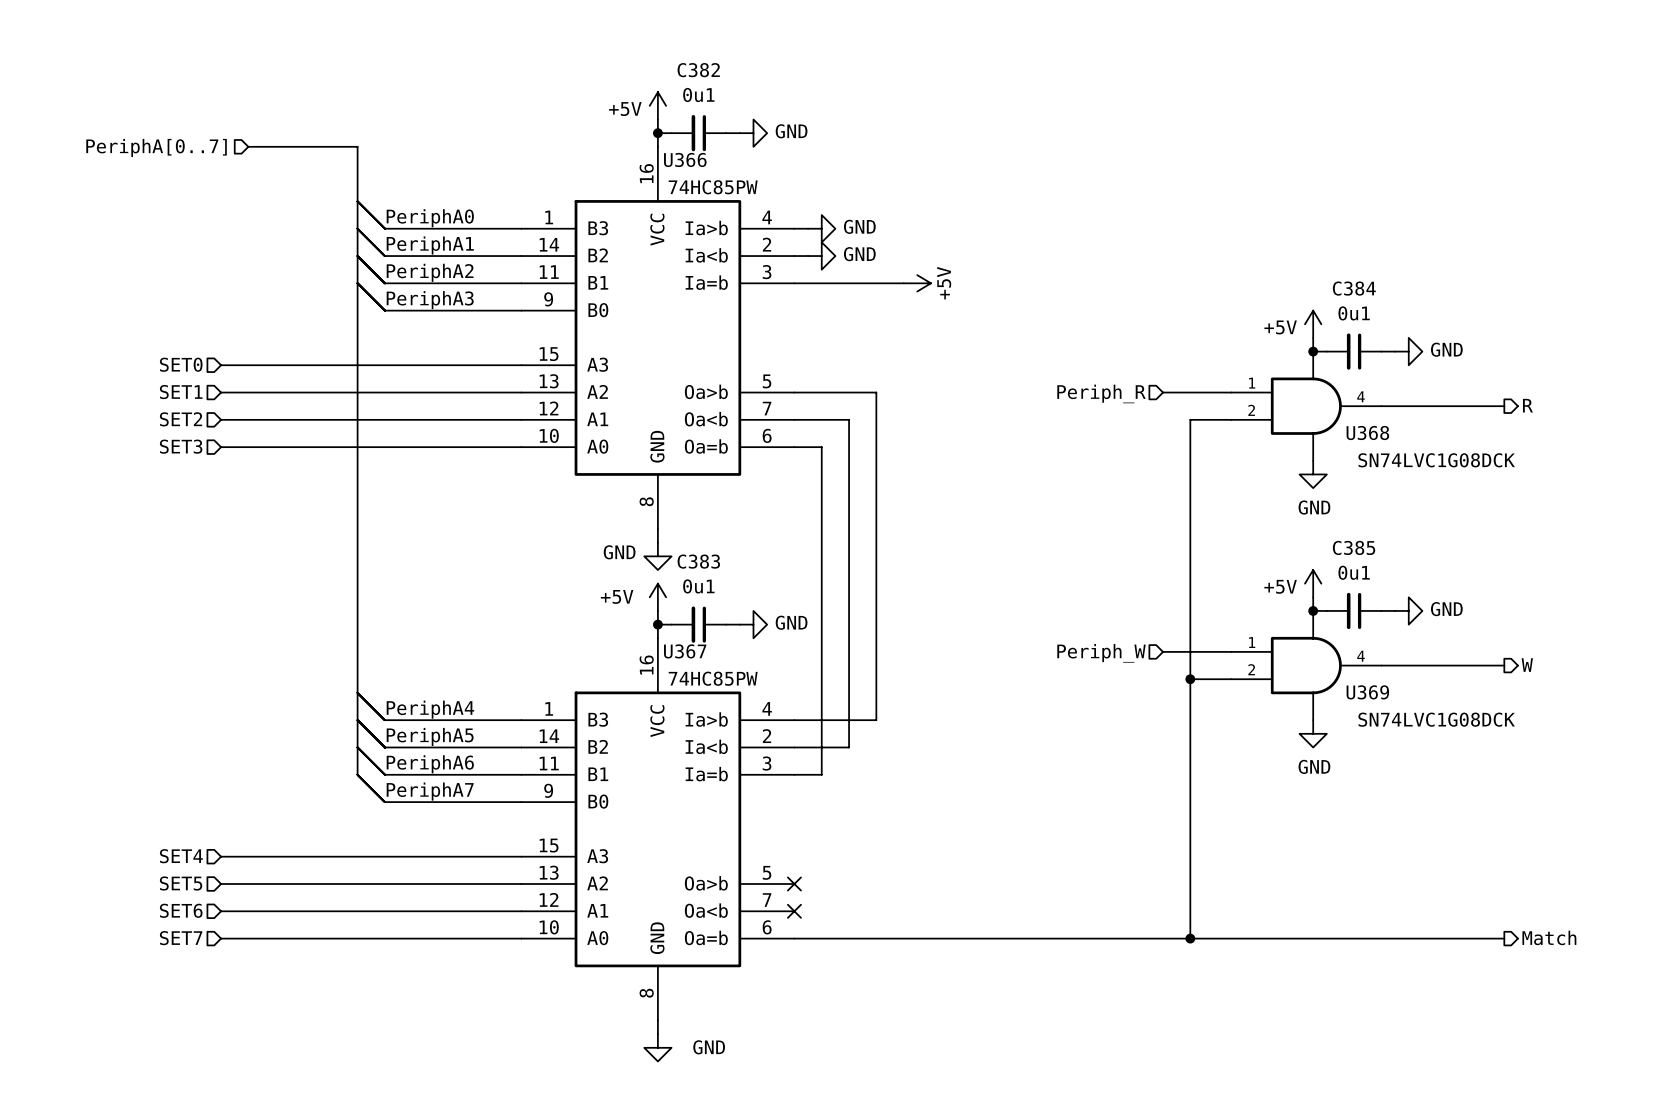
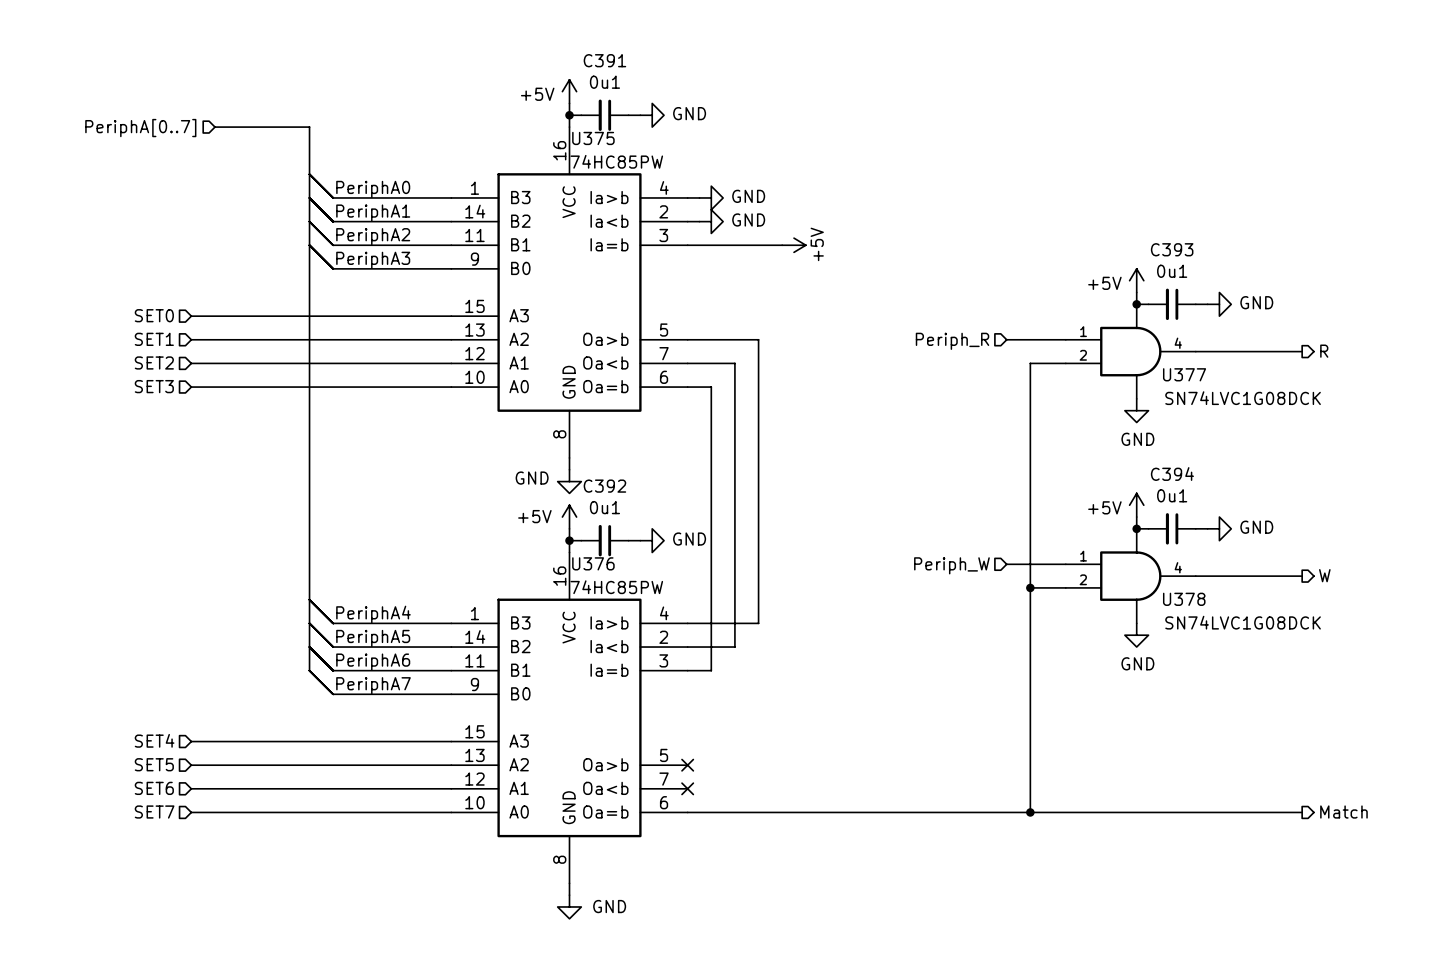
C382 name: C382 (698, 70) -> C391 (604, 60)
U366 name: U366 (685, 159) -> U375 (593, 138)
C384 name: C384 (1354, 288) -> C393 (1172, 249)
U368 name: U368 (1367, 432) -> U377 (1184, 374)
C385 name: C385 (1354, 547) -> C394 (1172, 474)
C383 name: C383 (698, 561) -> C392 (604, 486)
U367 name: U367 (685, 651) -> U376 (593, 563)
U369 name: U369 (1367, 692) -> U378 (1184, 599)

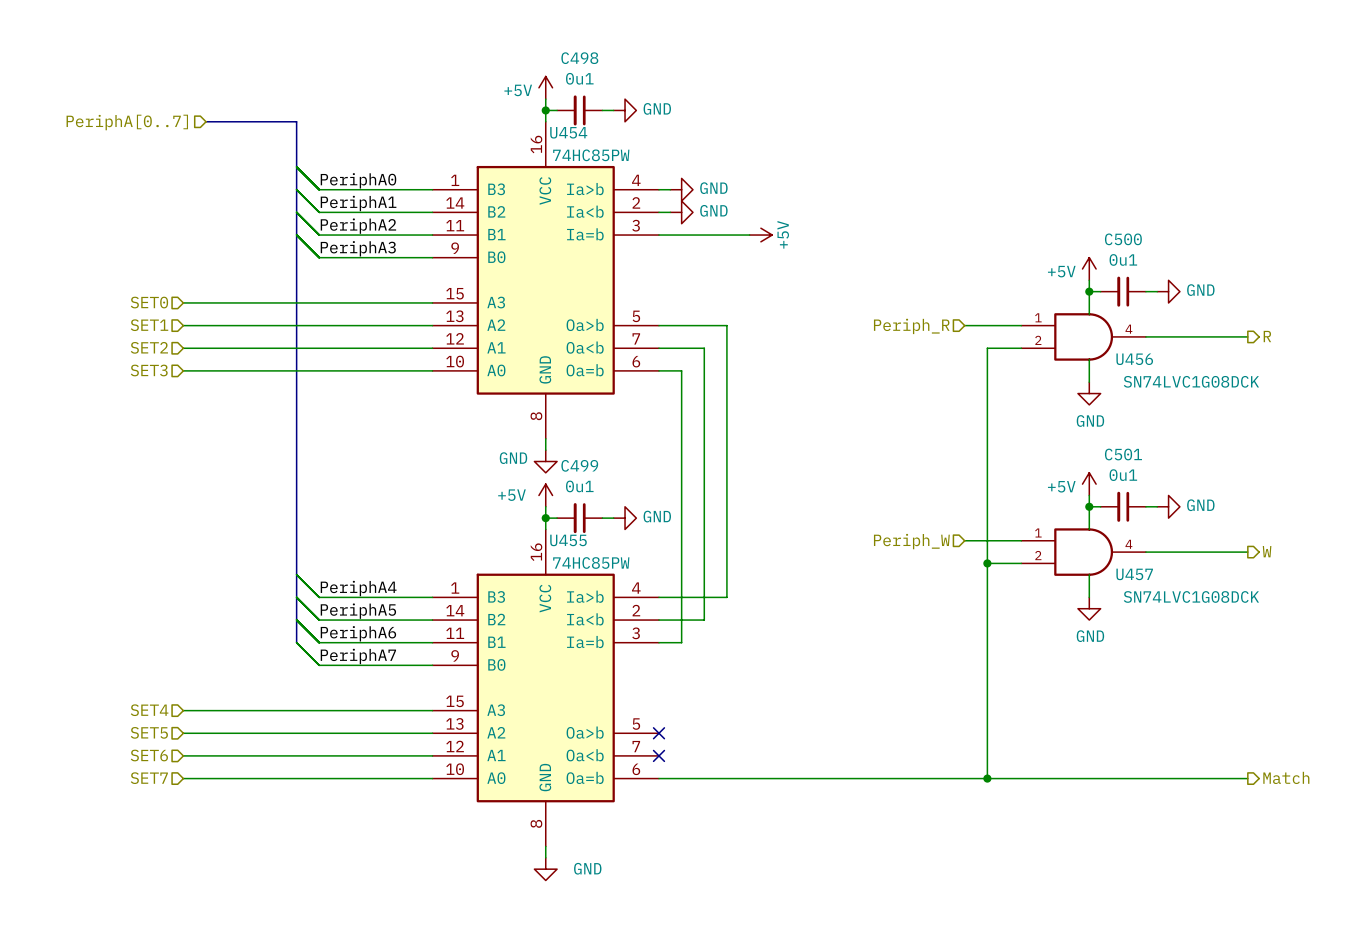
C391 name: C391 (604, 60) -> C498 (579, 58)
U375 name: U375 (593, 138) -> U454 (568, 132)
C393 name: C393 (1172, 249) -> C500 (1123, 239)
U377 name: U377 (1184, 374) -> U456 (1134, 359)
C394 name: C394 (1172, 474) -> C501 (1123, 454)
C392 name: C392 (604, 486) -> C499 (579, 465)
U376 name: U376 (593, 563) -> U455 (568, 540)
U378 name: U378 (1184, 599) -> U457 (1134, 574)

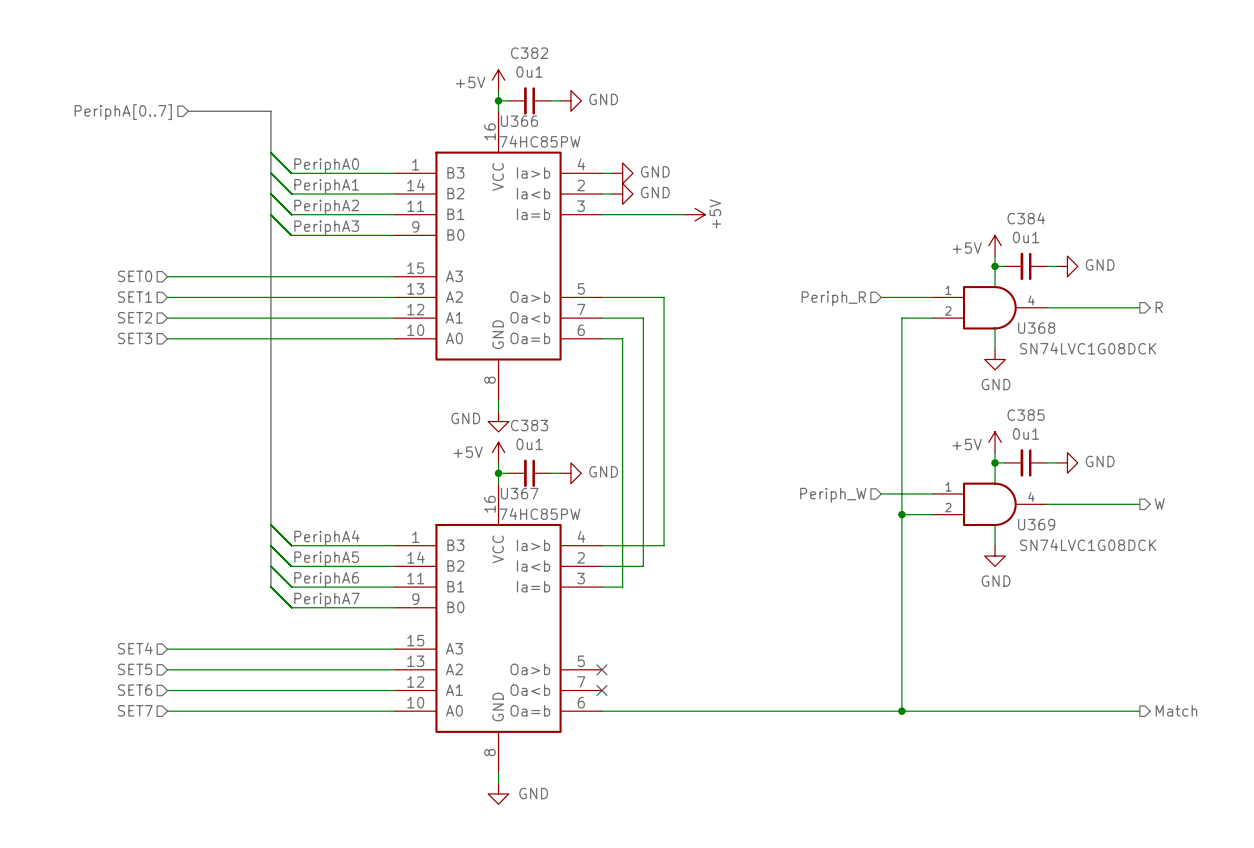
C498 name: C498 (579, 58) -> C382 (529, 53)
U454 name: U454 (568, 132) -> U366 (519, 121)
C500 name: C500 (1123, 239) -> C384 (1026, 218)
U456 name: U456 (1134, 359) -> U368 (1036, 328)
C501 name: C501 (1123, 454) -> C385 (1026, 415)
C499 name: C499 (579, 465) -> C383 (529, 425)
U455 name: U455 (568, 540) -> U367 (519, 493)
U457 name: U457 (1134, 574) -> U369 (1036, 524)

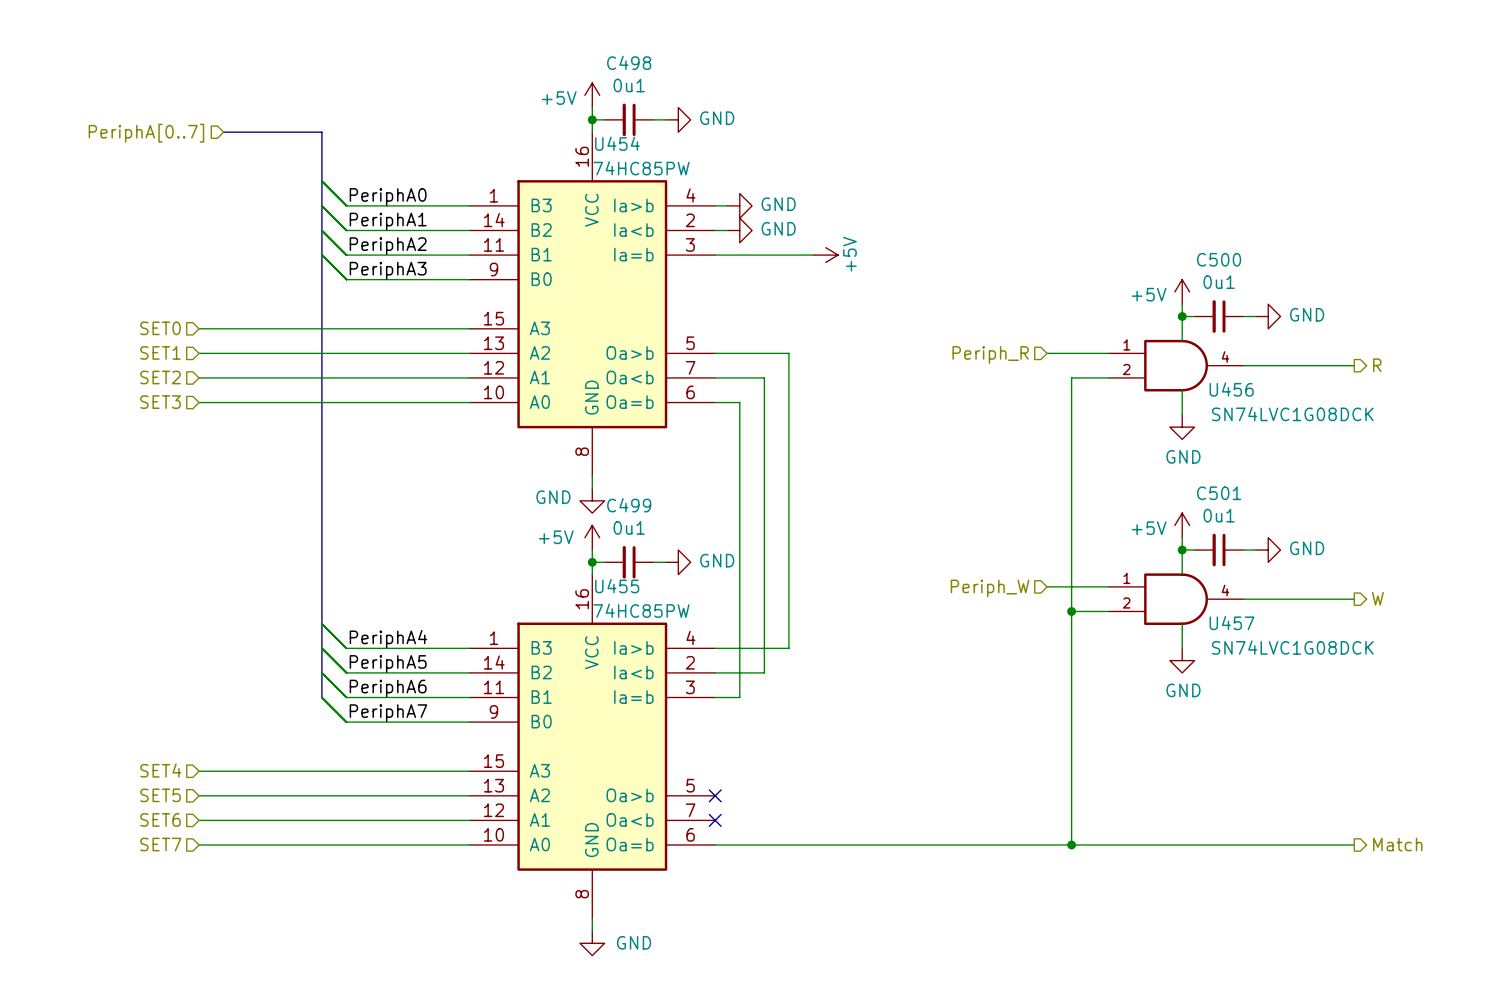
C382 name: C382 (529, 53) -> C498 (629, 62)
U366 name: U366 (519, 121) -> U454 (617, 143)
C384 name: C384 (1026, 218) -> C500 (1219, 259)
U368 name: U368 (1036, 328) -> U456 (1231, 389)
C385 name: C385 (1026, 415) -> C501 (1219, 493)
C383 name: C383 (529, 425) -> C499 (629, 505)
U367 name: U367 (519, 493) -> U455 (617, 586)
U369 name: U369 (1036, 524) -> U457 (1231, 623)

